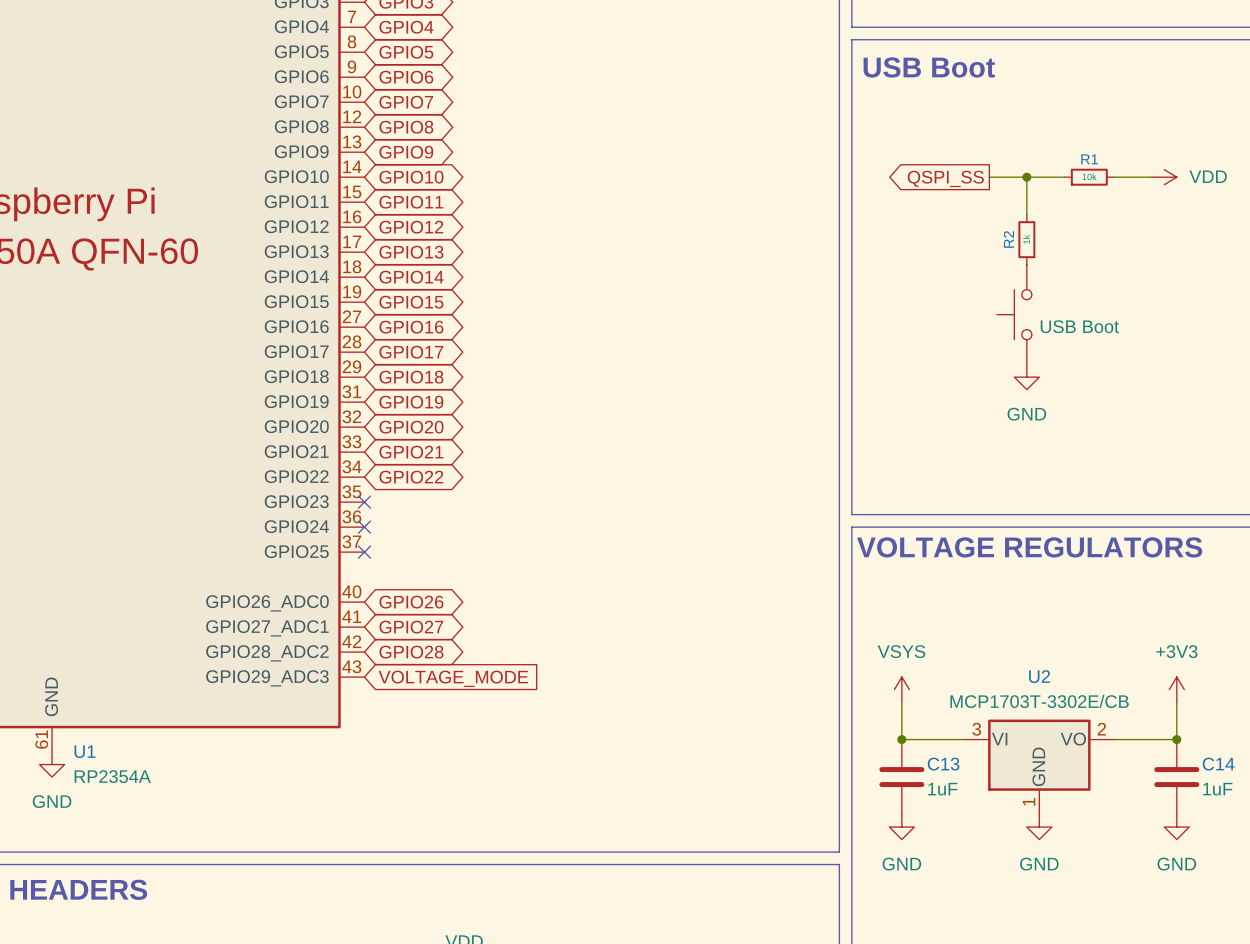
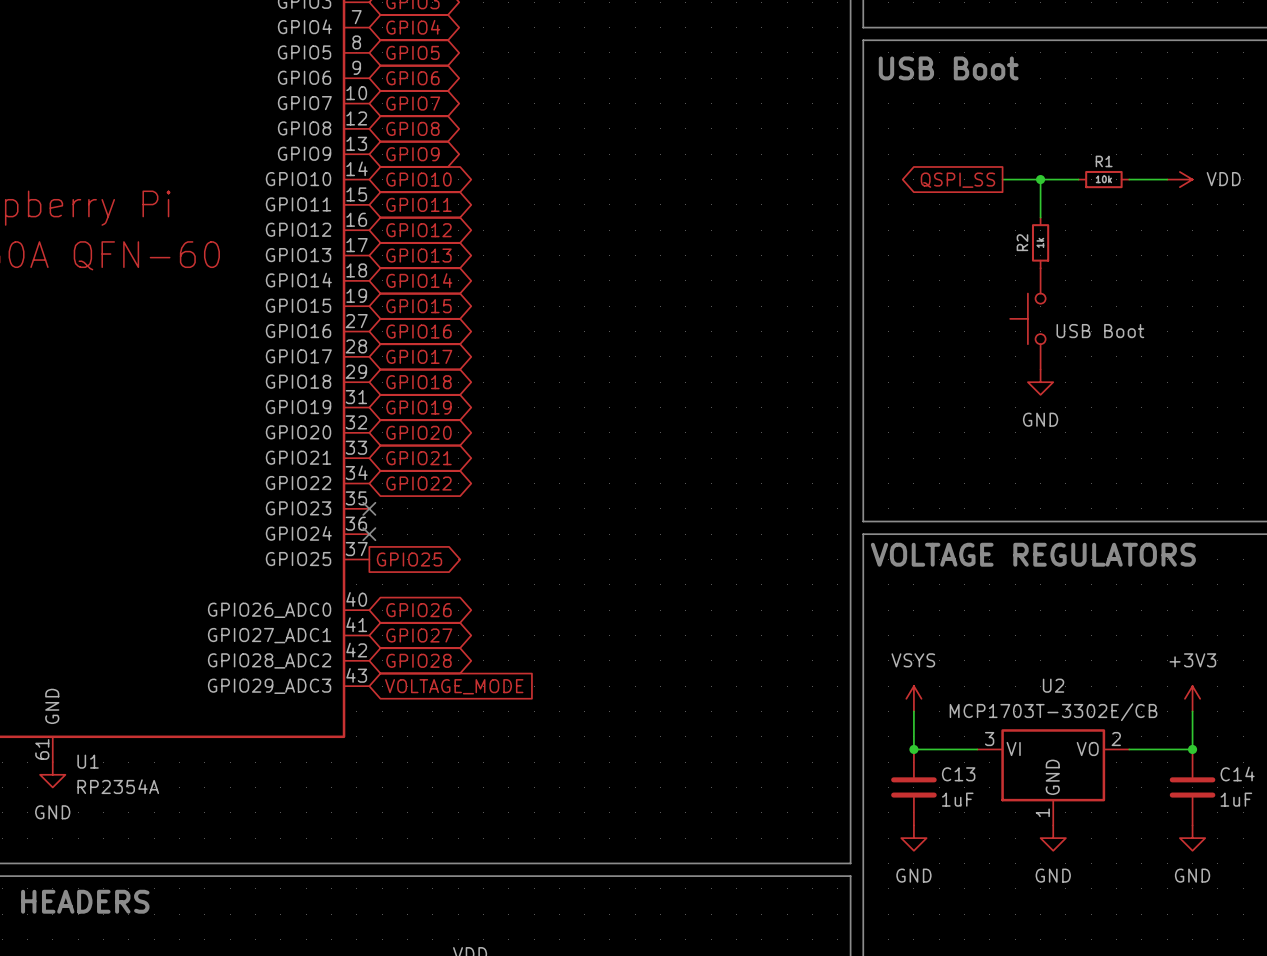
no-connect mark: (364, 552) -> none
global label: none -> GPIO25 (409, 559)

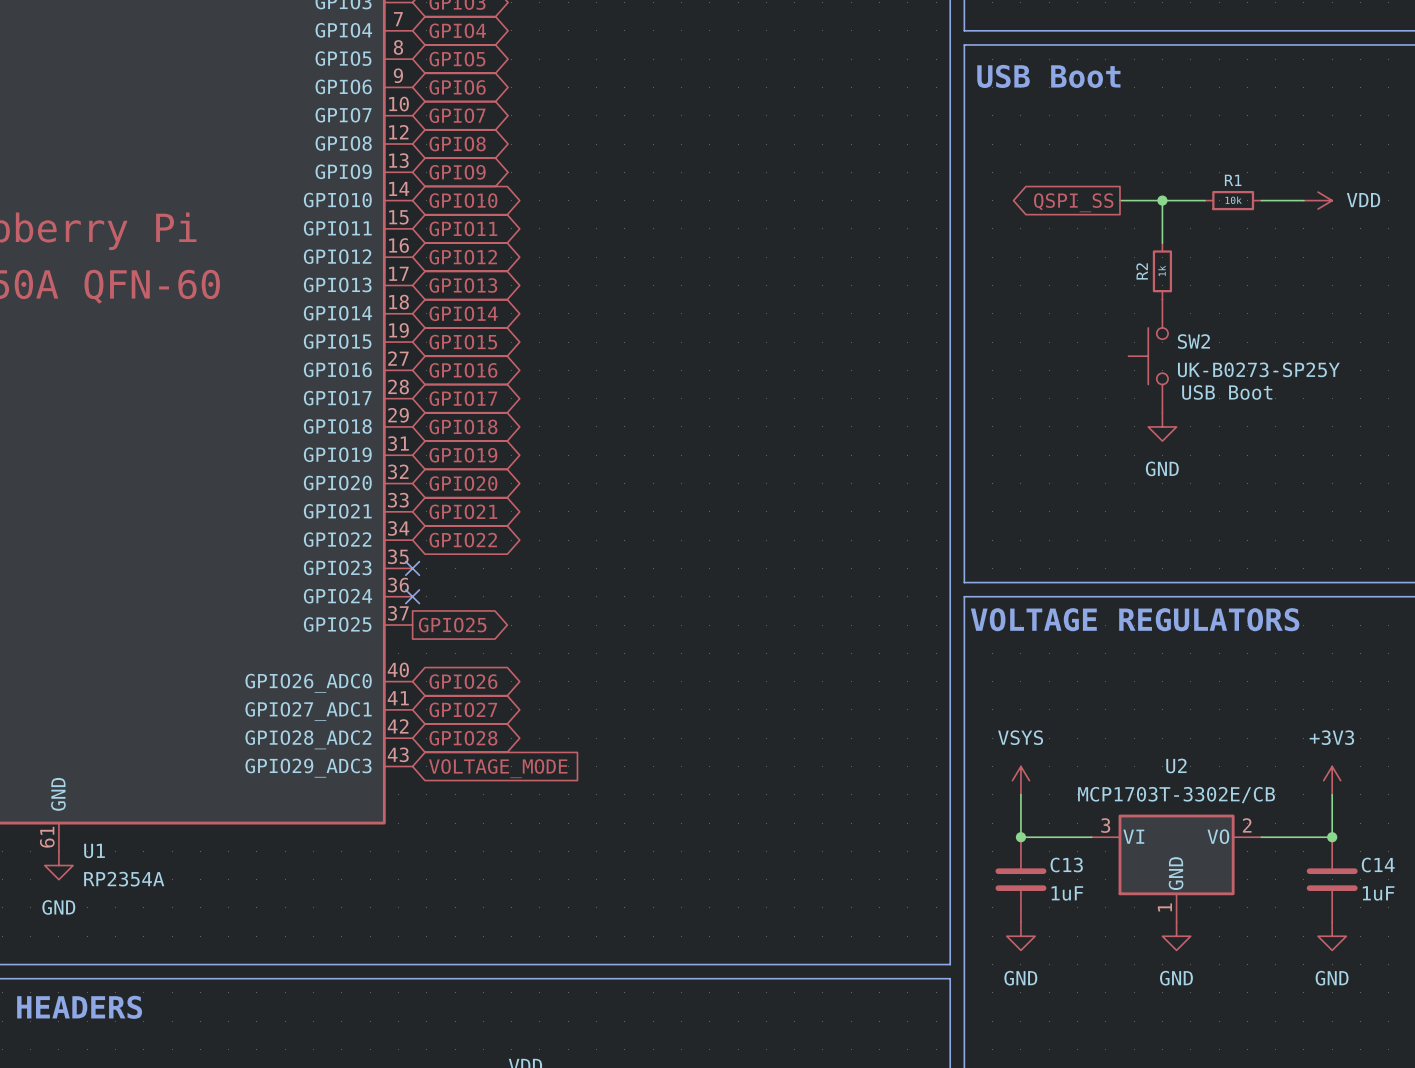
SW2 name: none -> SW2 (1193, 341)
SW2 value: USB Boot (1100, 331) -> UK-B0273-SP25Y (1258, 369)
SW2 text: none -> USB Boot (1227, 392)

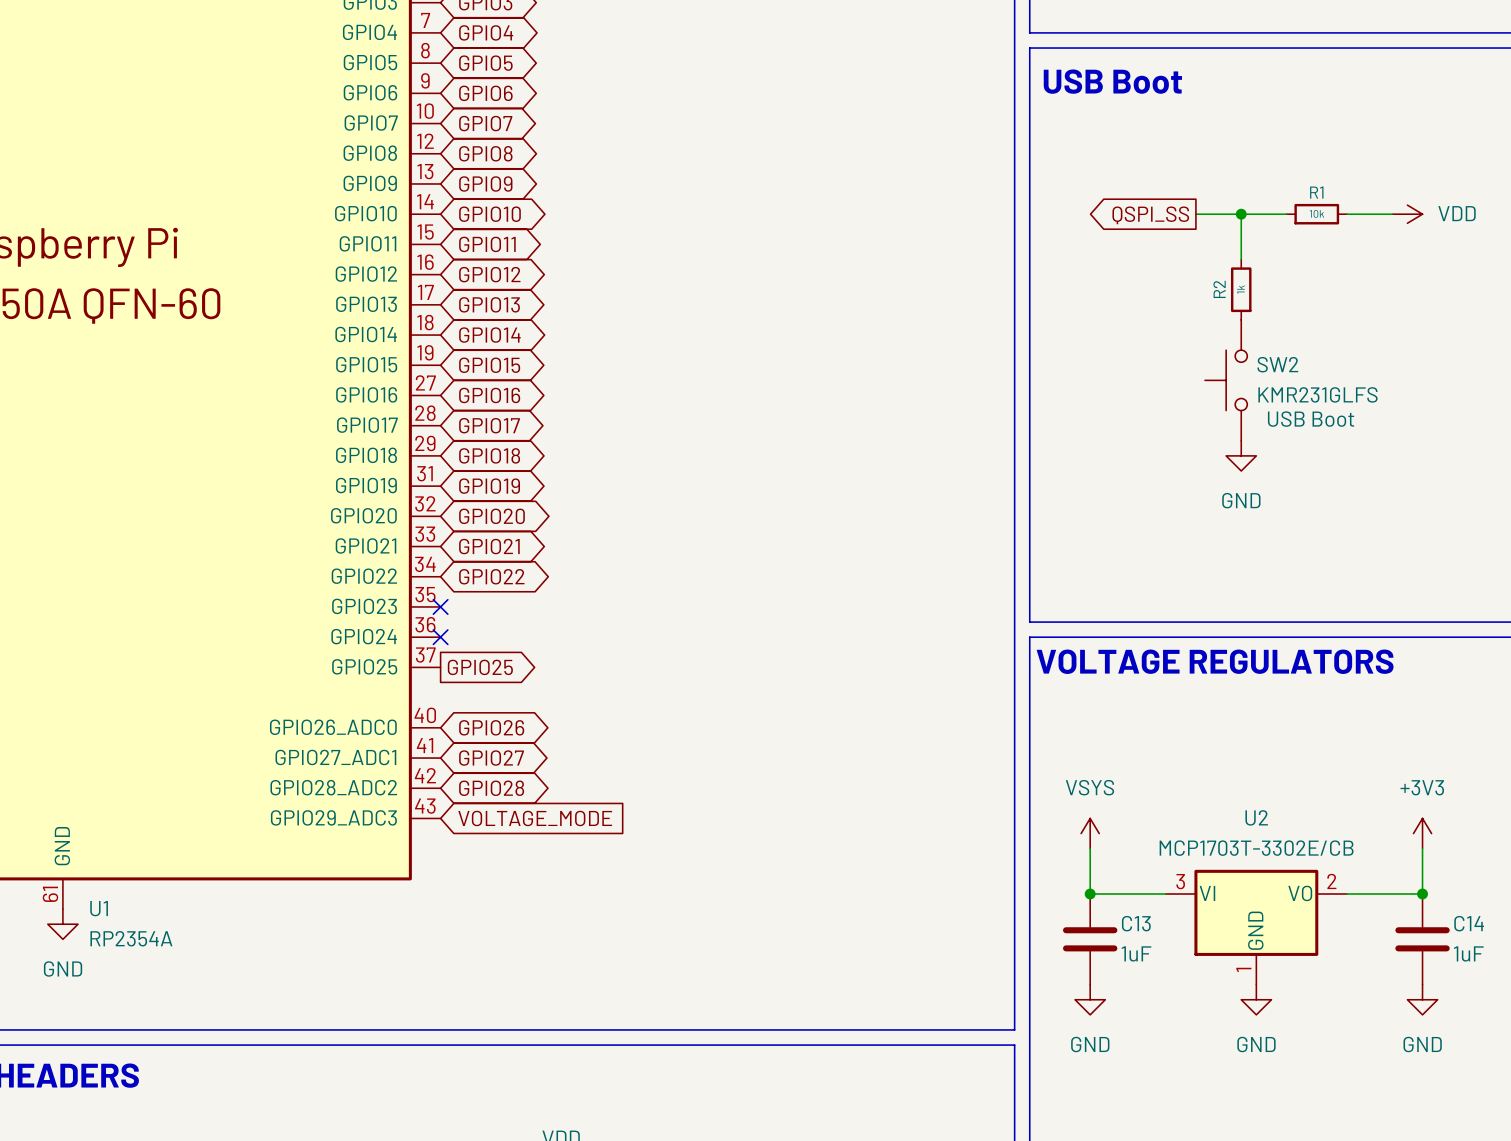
SW2 value: UK-B0273-SP25Y (1258, 369) -> KMR231GLFS (1317, 394)

